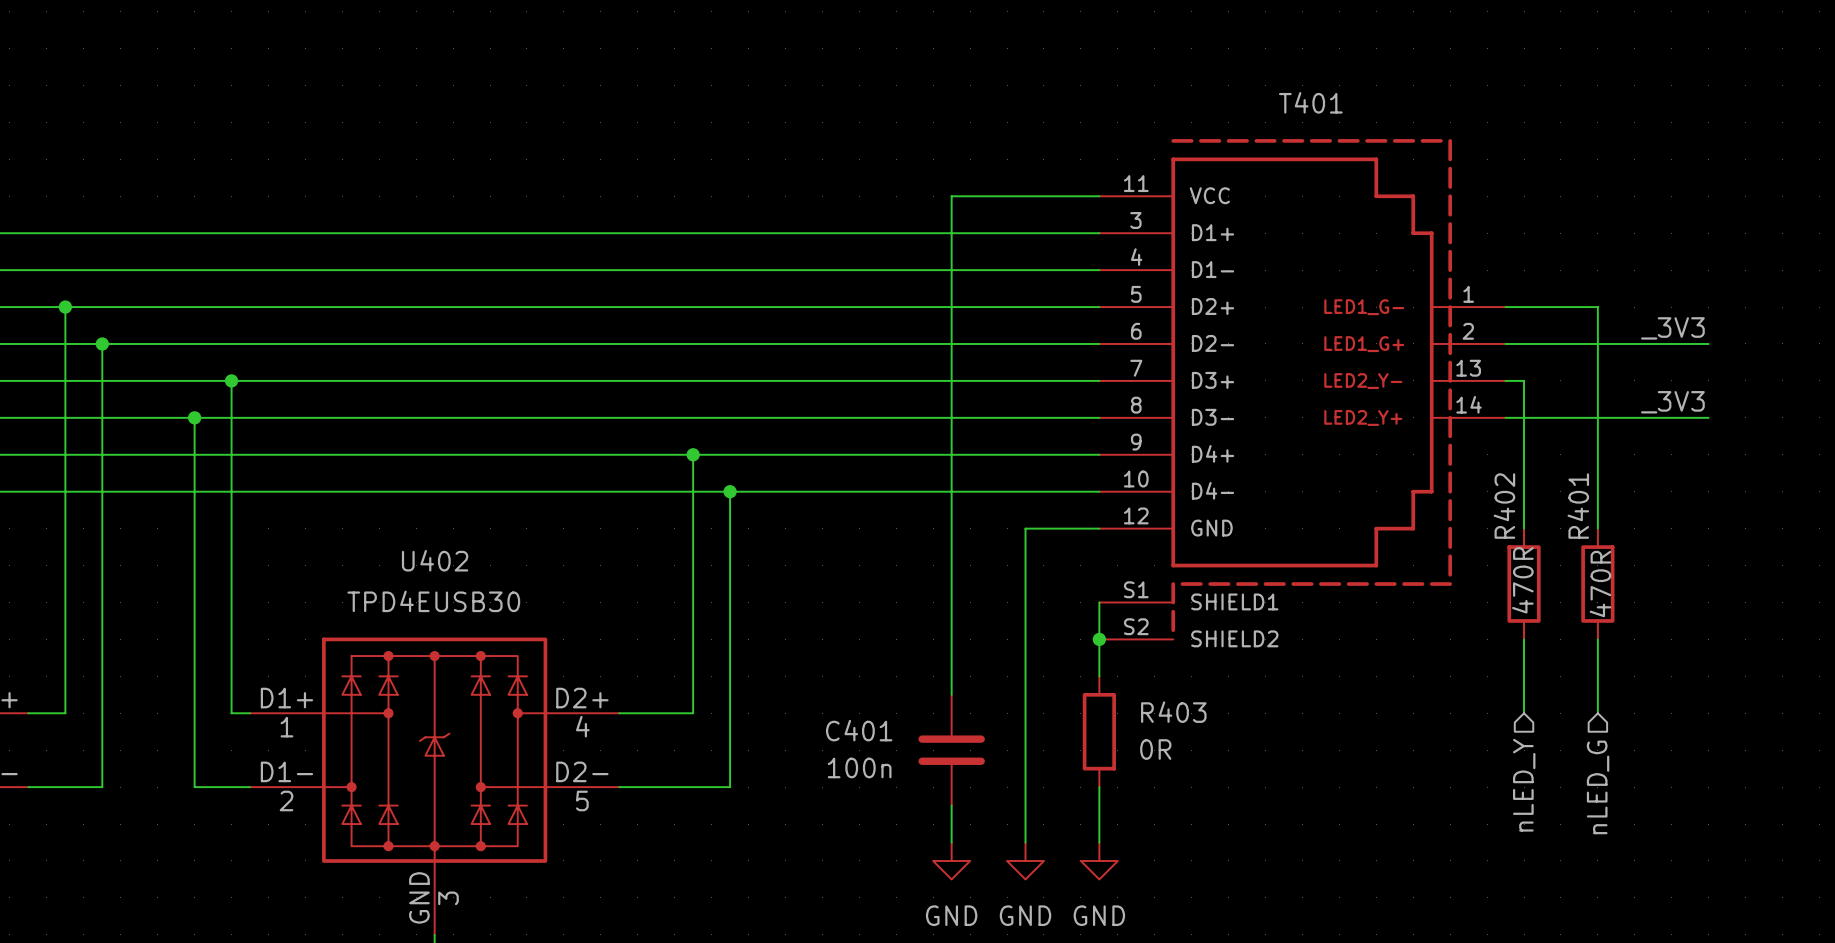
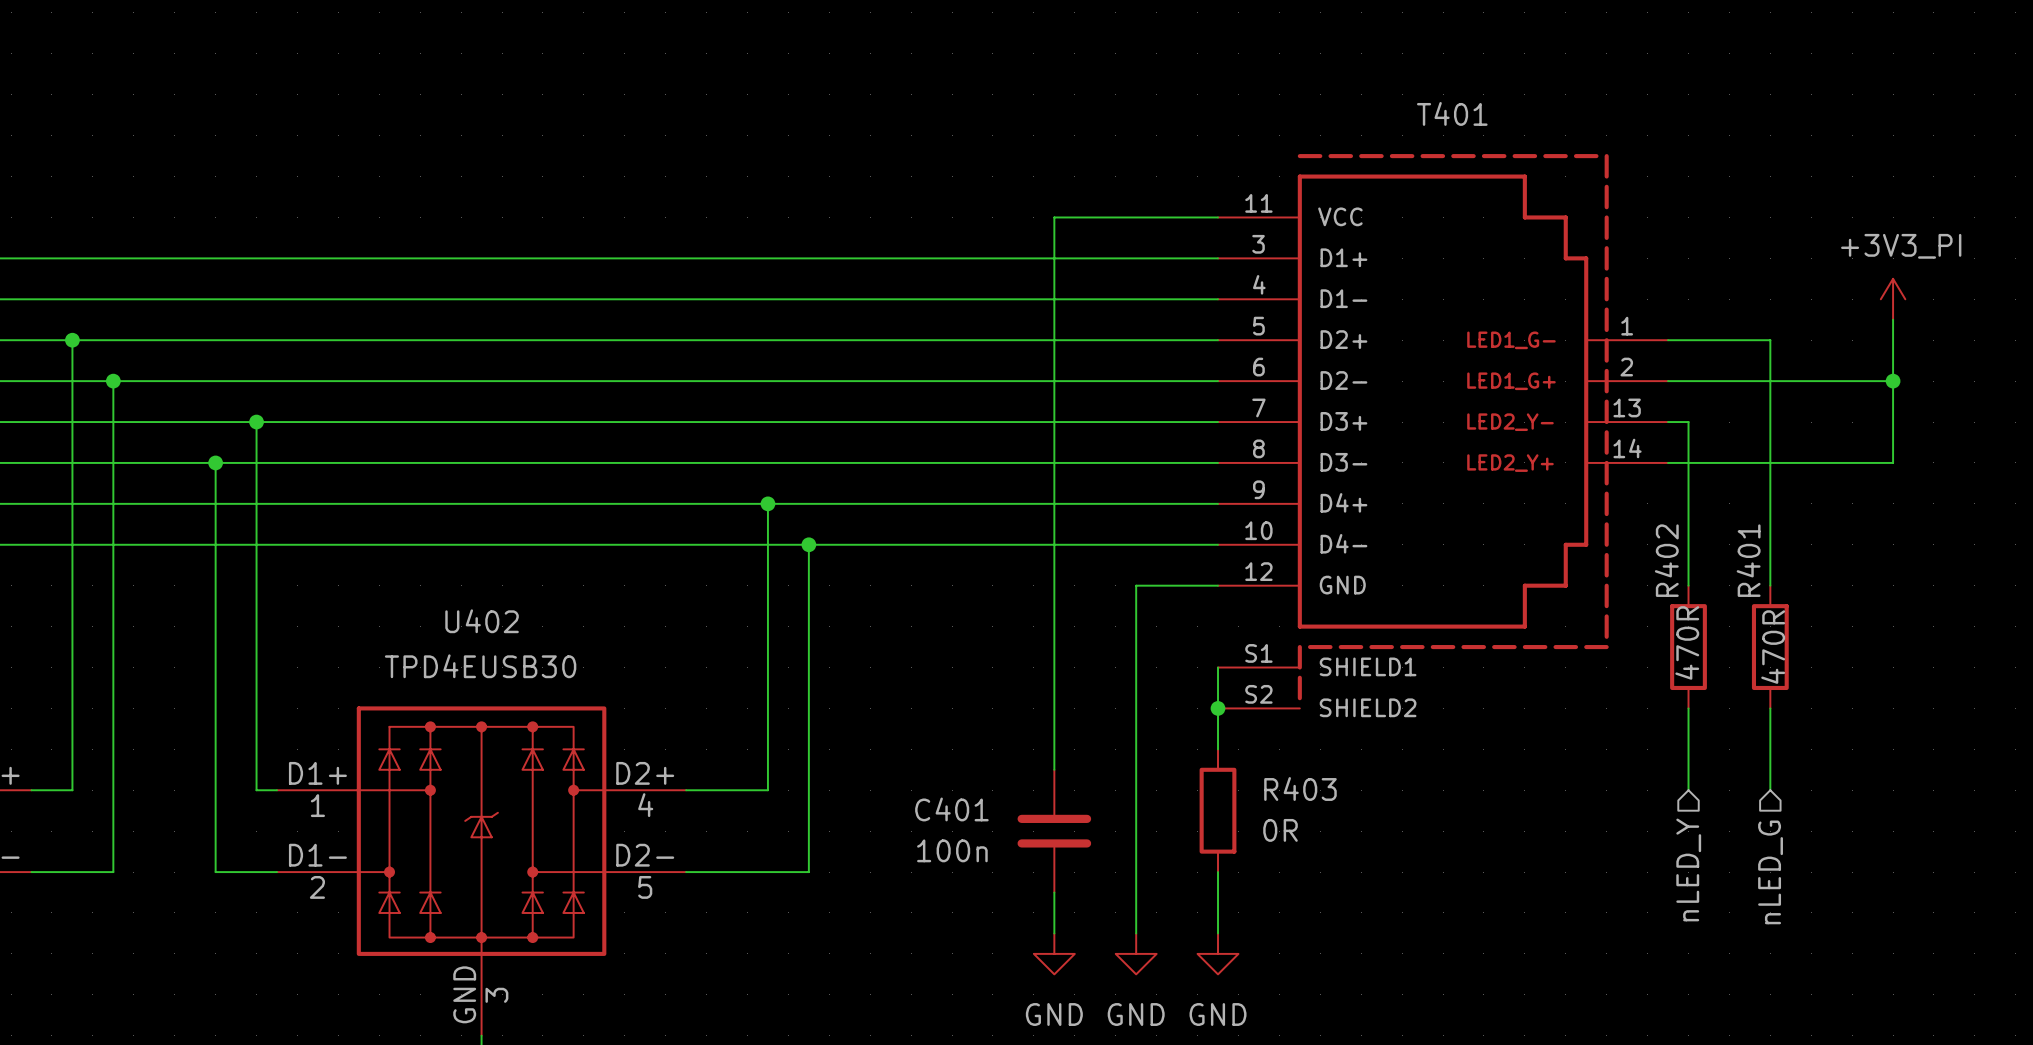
power symbol: none -> +3V3_PI (1893, 299)
wire: none -> (1893, 319) (1893, 462)
label: _3V3 (1672, 328) -> none
junction: none -> (1893, 381)
label: _3V3 (1672, 402) -> none

